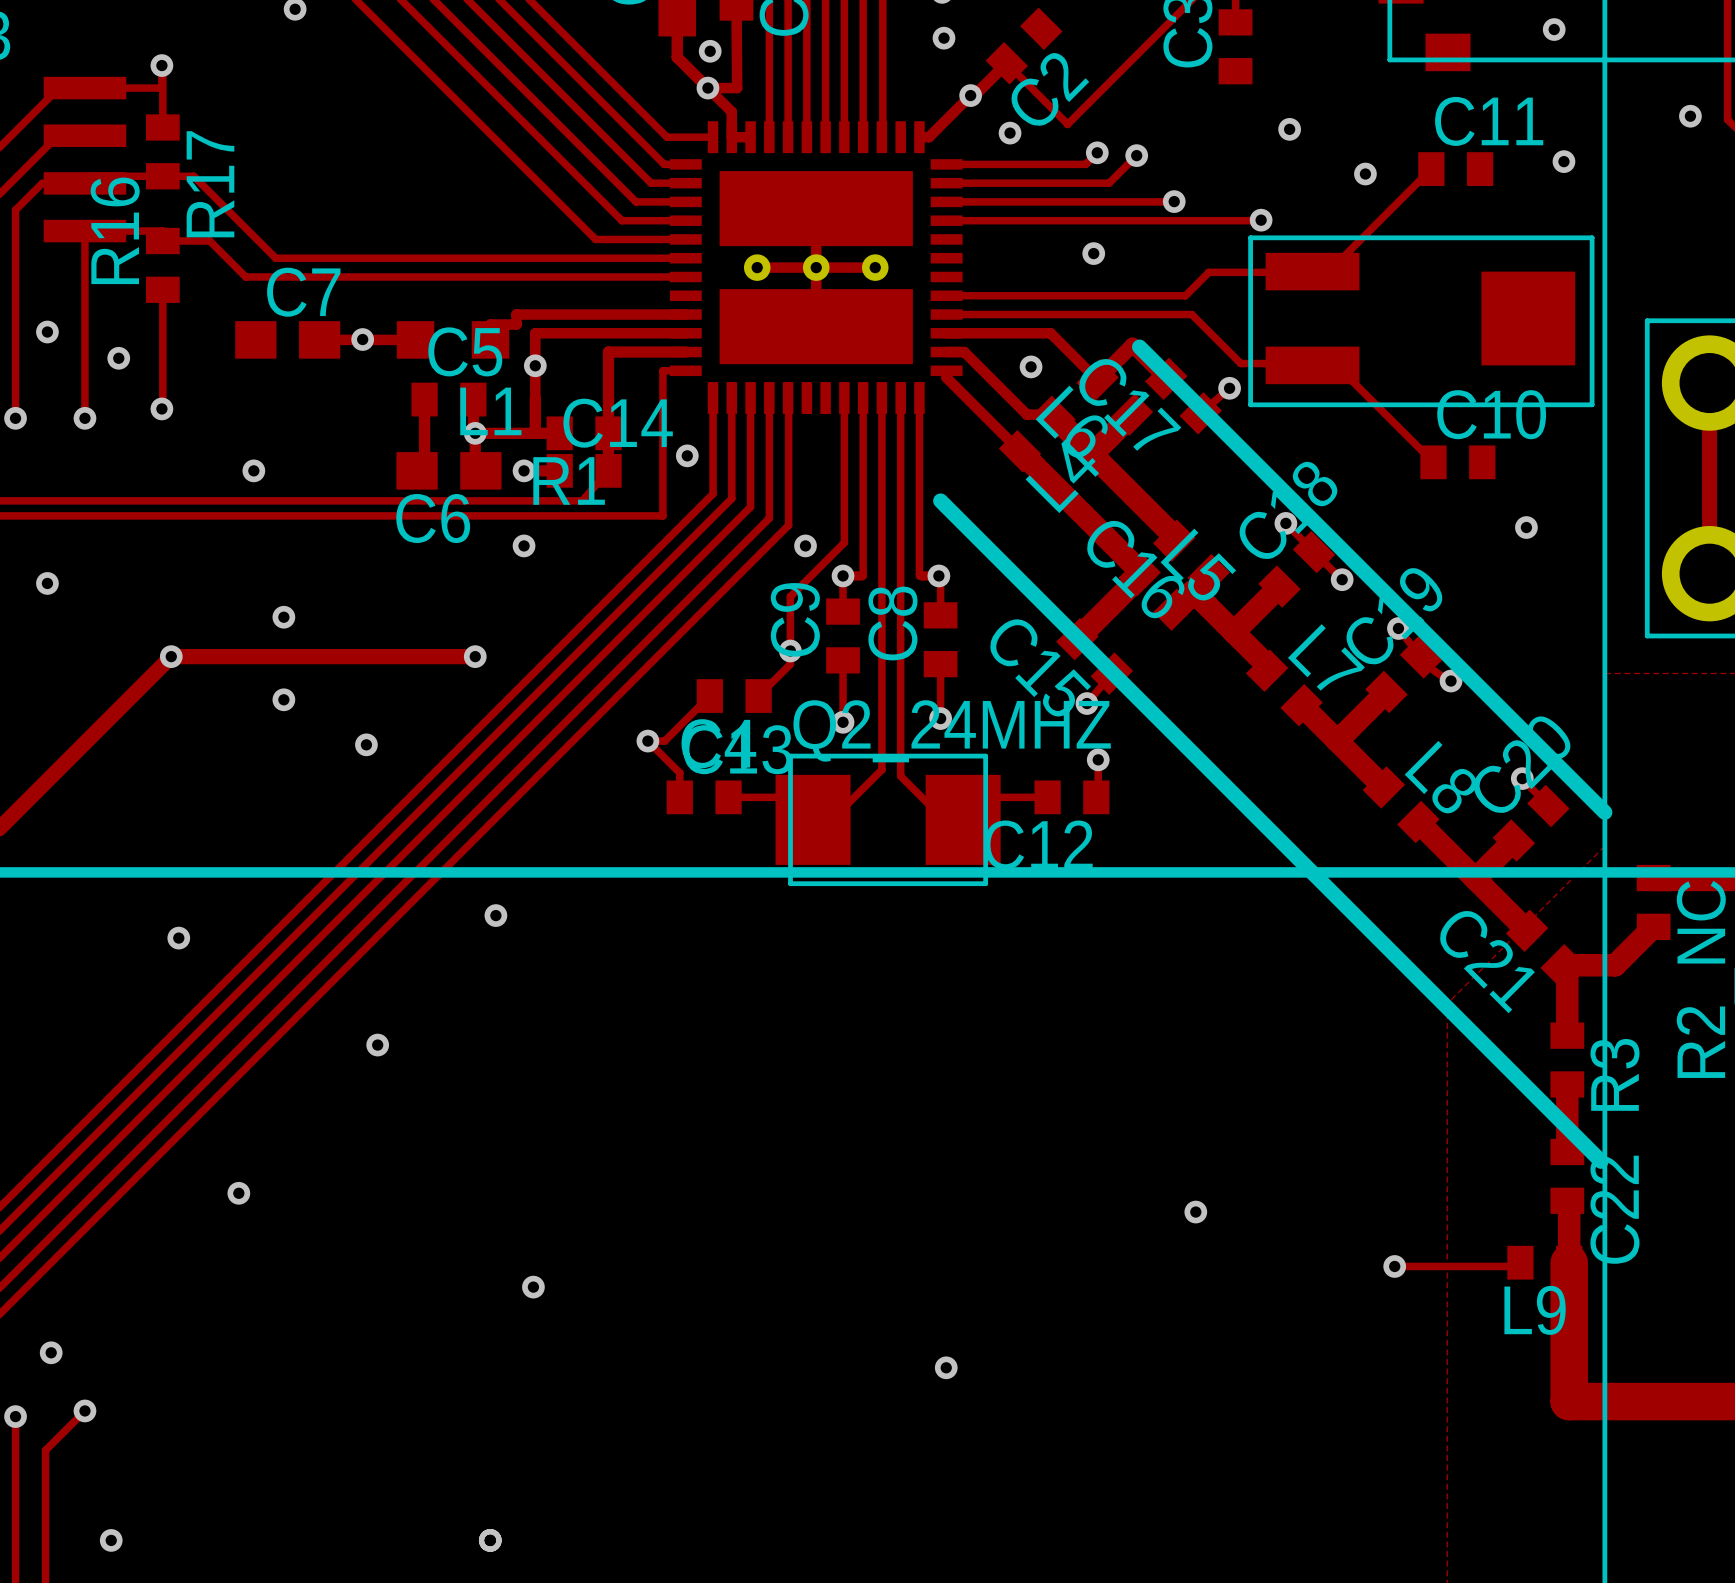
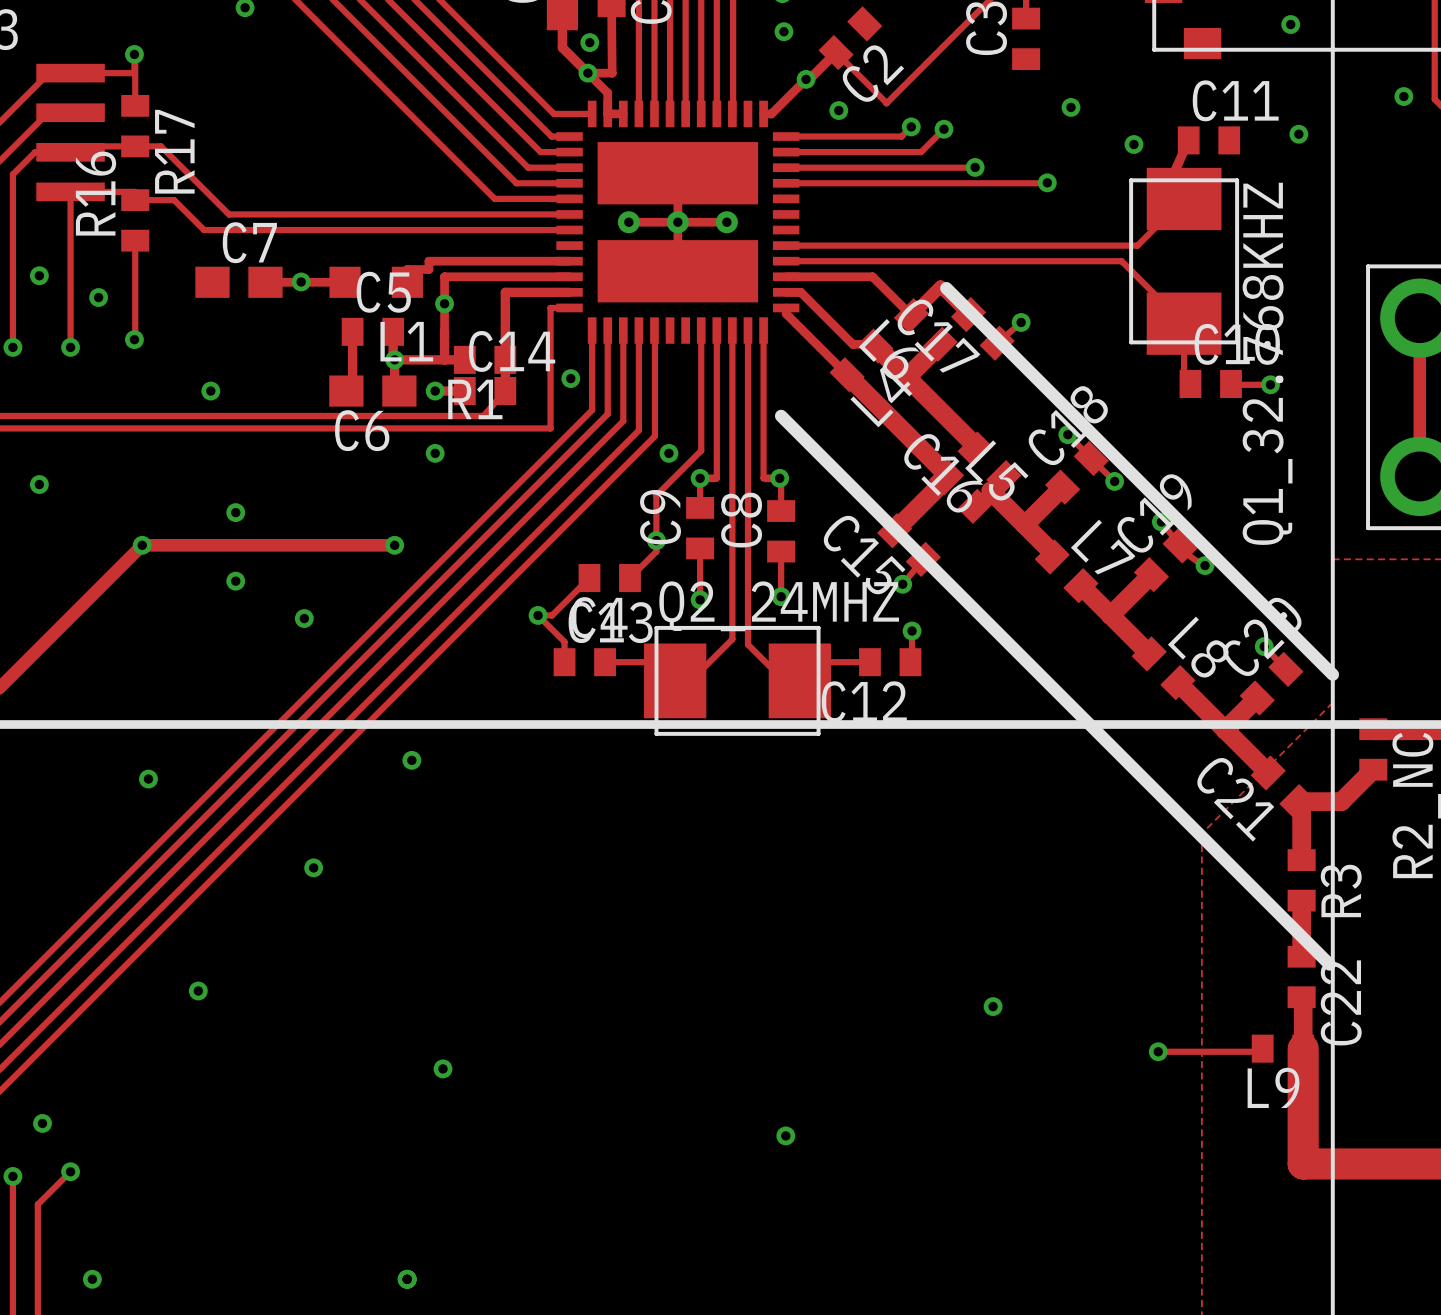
track: (1431, 169) (1328, 271) (1208, 272) (1185, 295) -> (1188, 140) (1162, 199) (1184, 199) (1137, 245) (984, 245)
via: (1093, 253) -> none
track: (1191, 314) (1240, 363) (1336, 365) (1425, 454) -> (989, 261) (1121, 261) (1184, 323) (1184, 377)
Q1_32.768KHZ: none -> (1184, 261)
part: (1421, 321) -> none
via: (1031, 366) -> none
track: none -> (1231, 383) (1270, 384)
via position: (1526, 527) -> (1270, 384)

